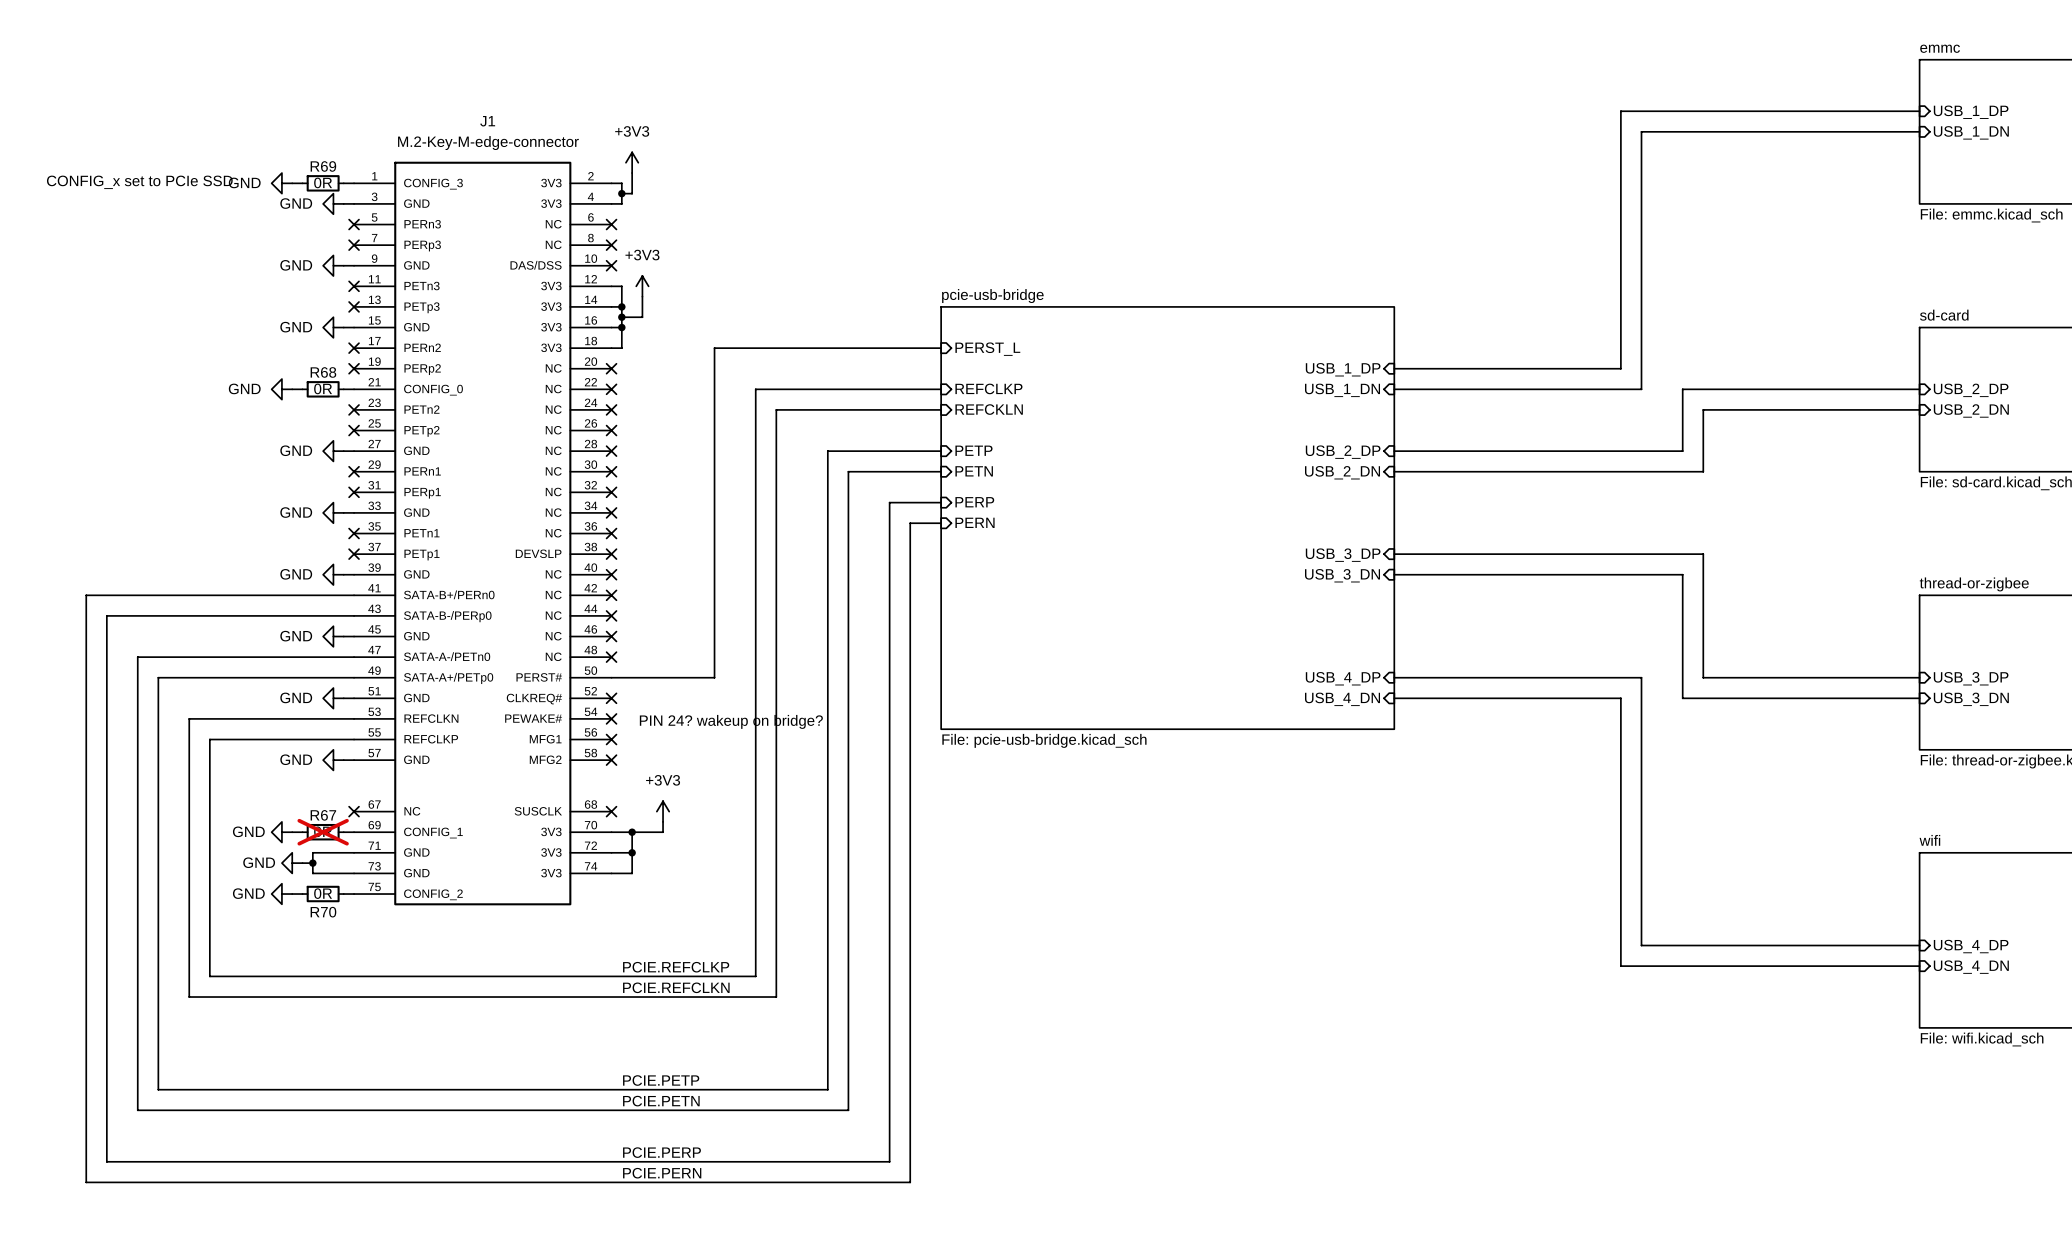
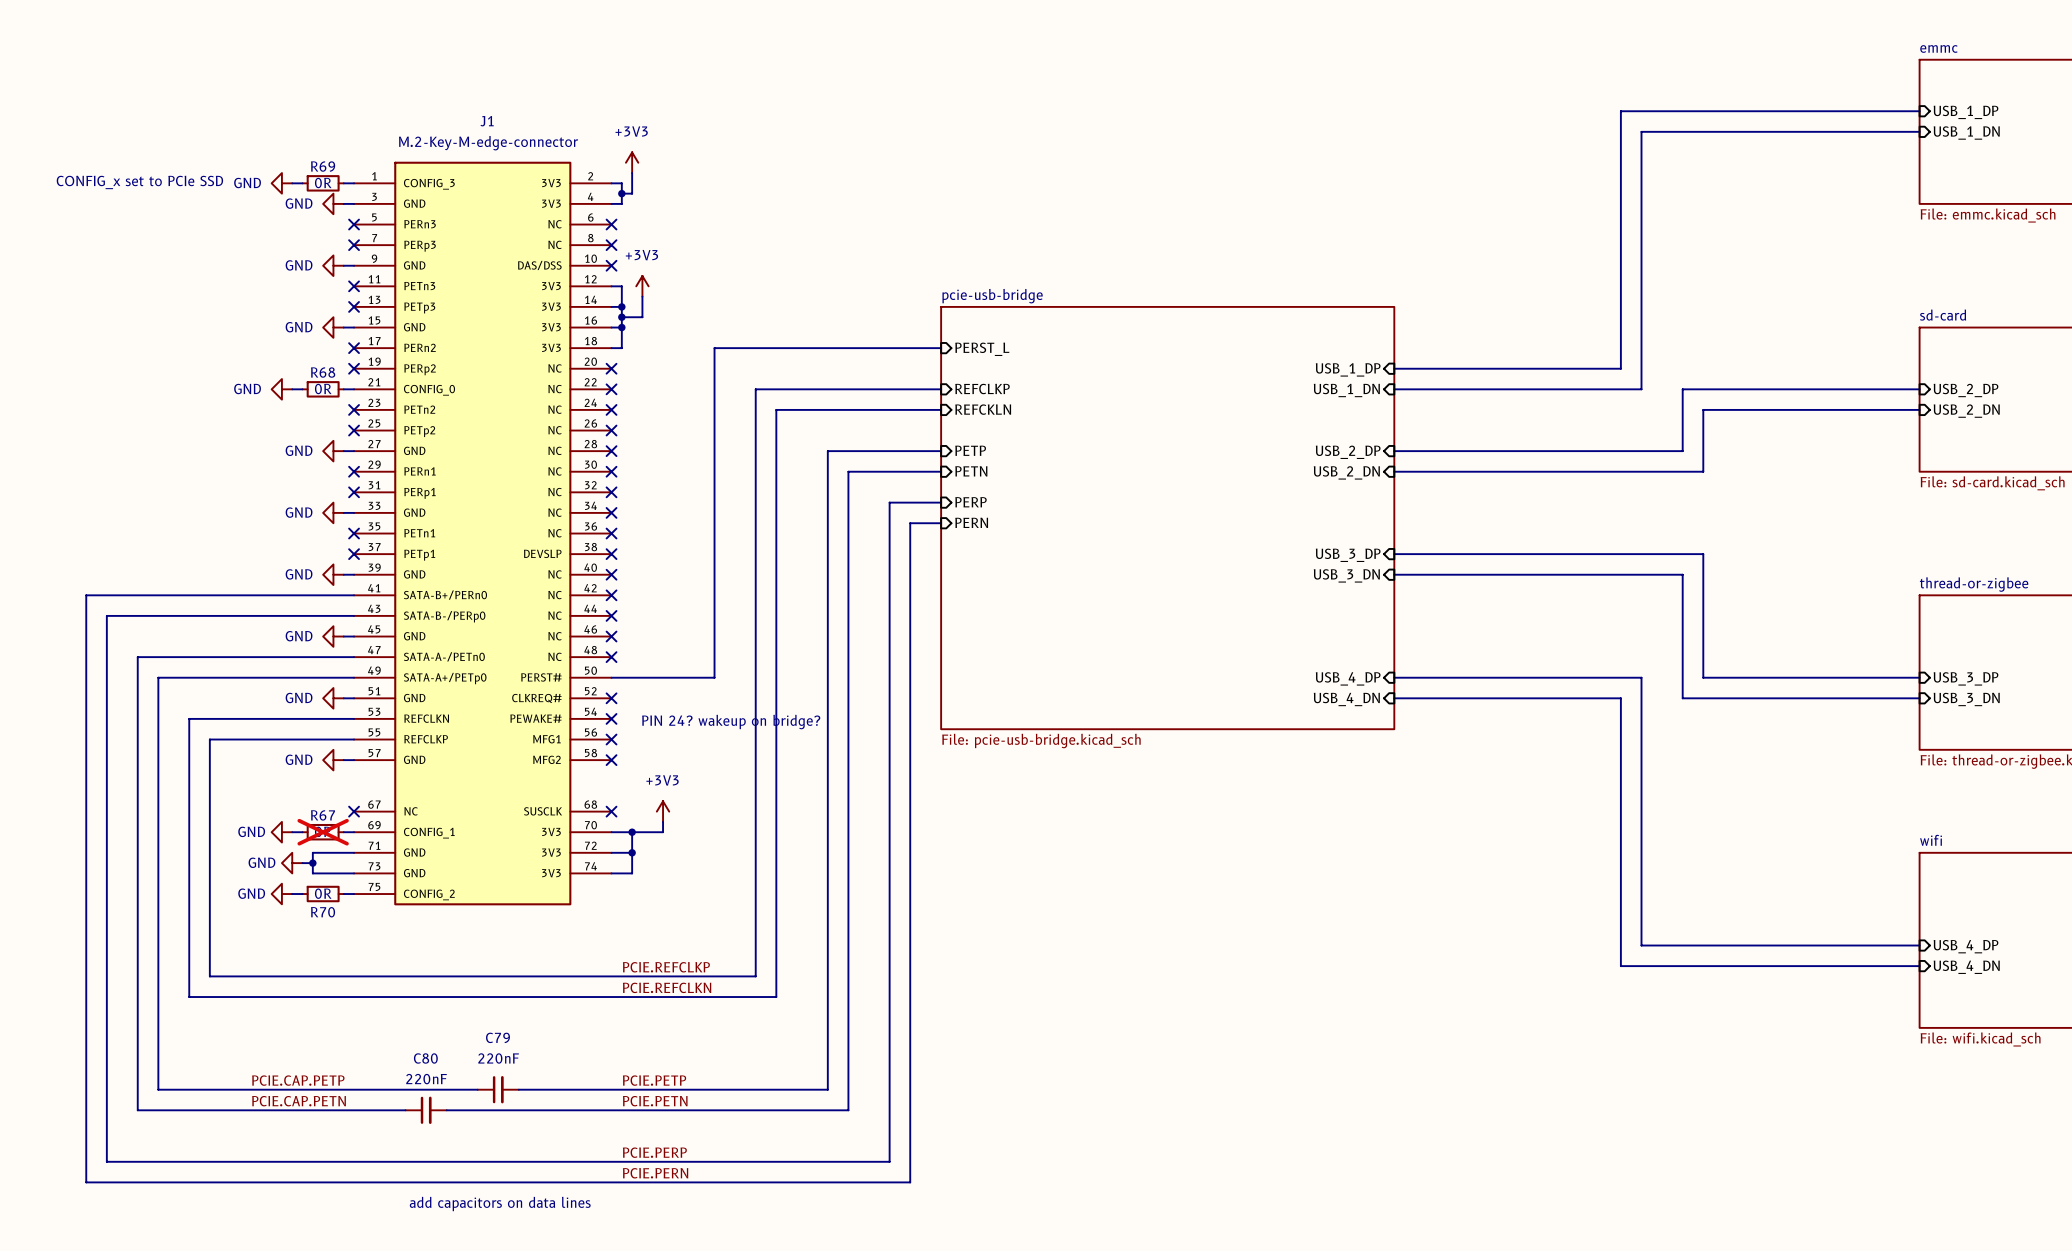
label: none -> PCIE.CAP.PETP (298, 1080)
C79: none -> (498, 1089)
label: none -> PCIE.CAP.PETN (298, 1101)
C80: none -> (426, 1110)
text: none -> add capacitors on data lines (500, 1204)

